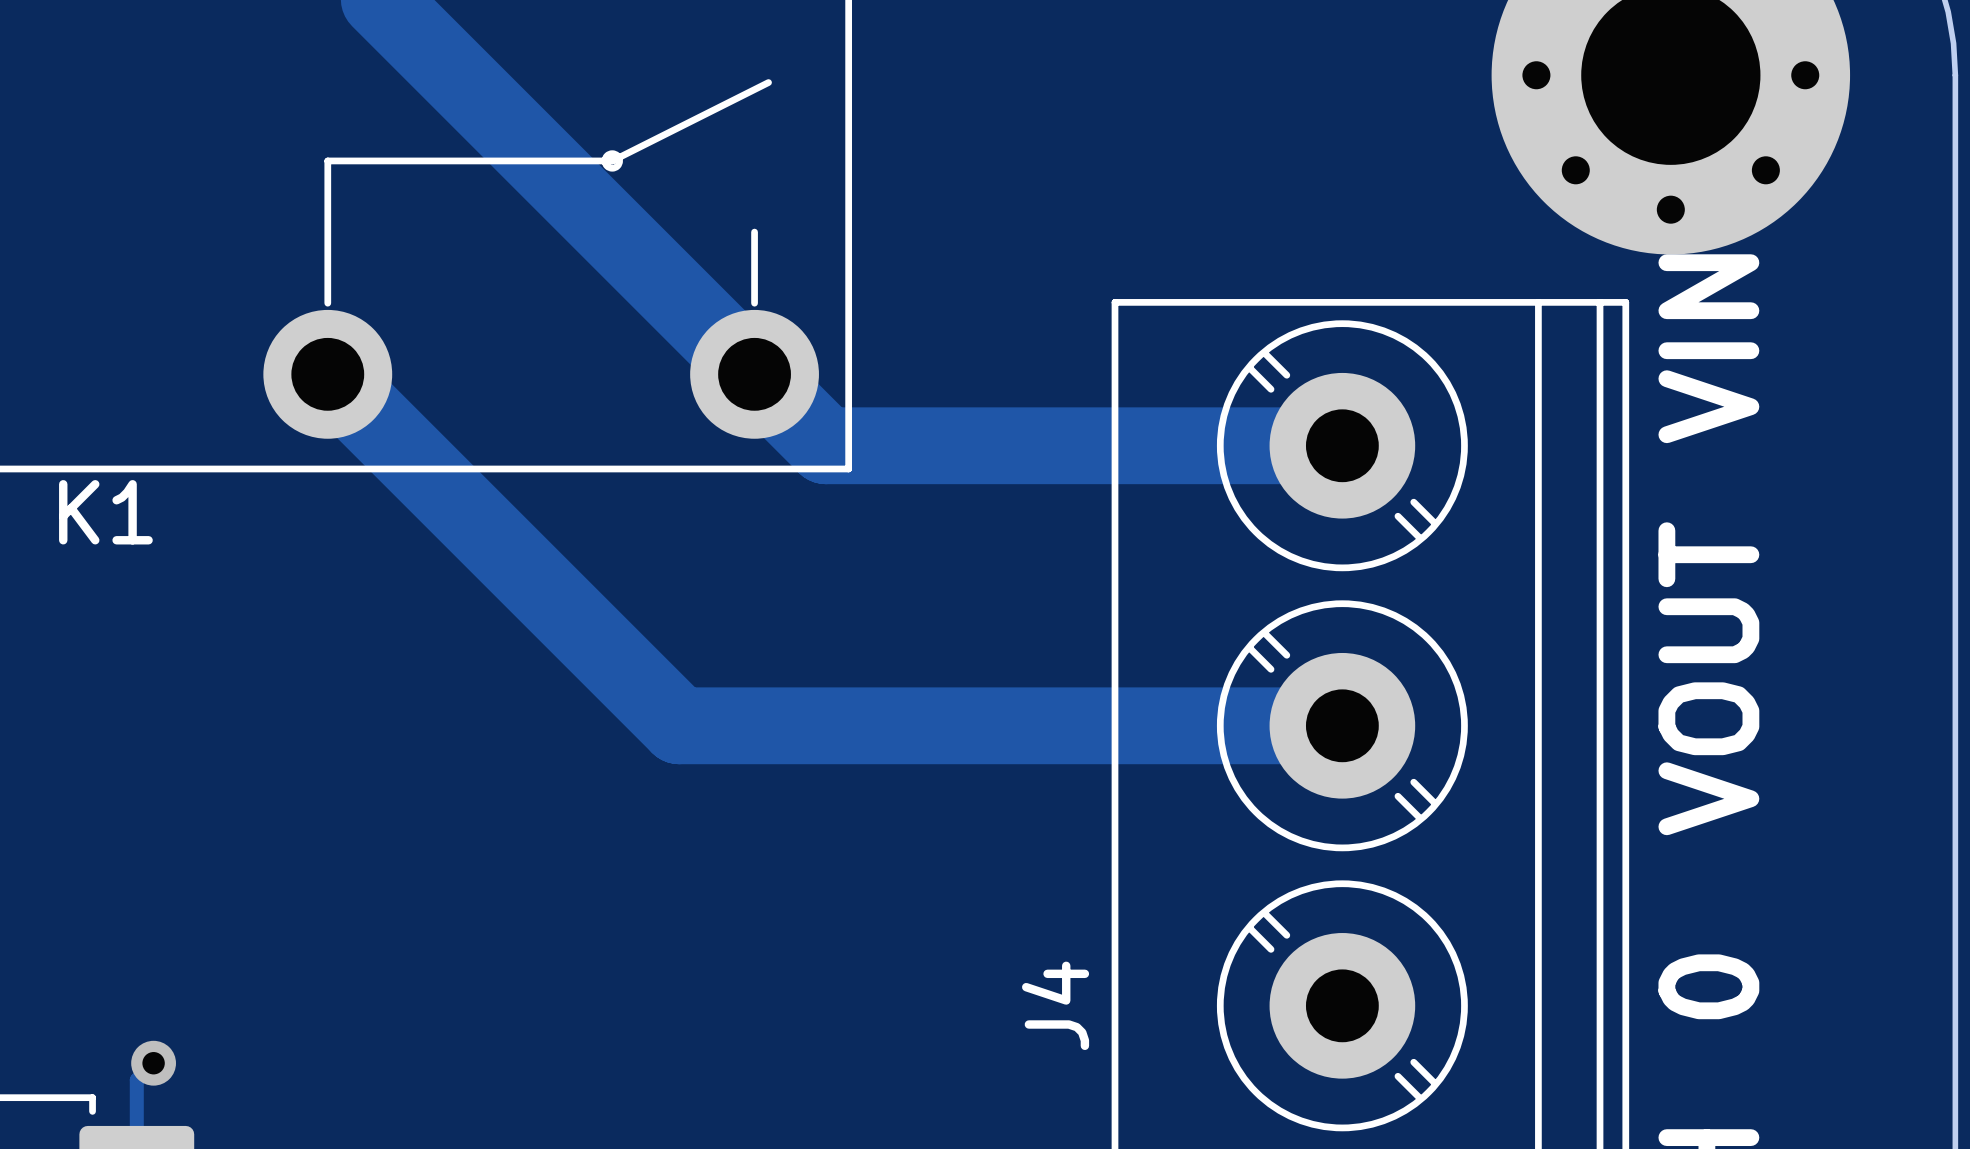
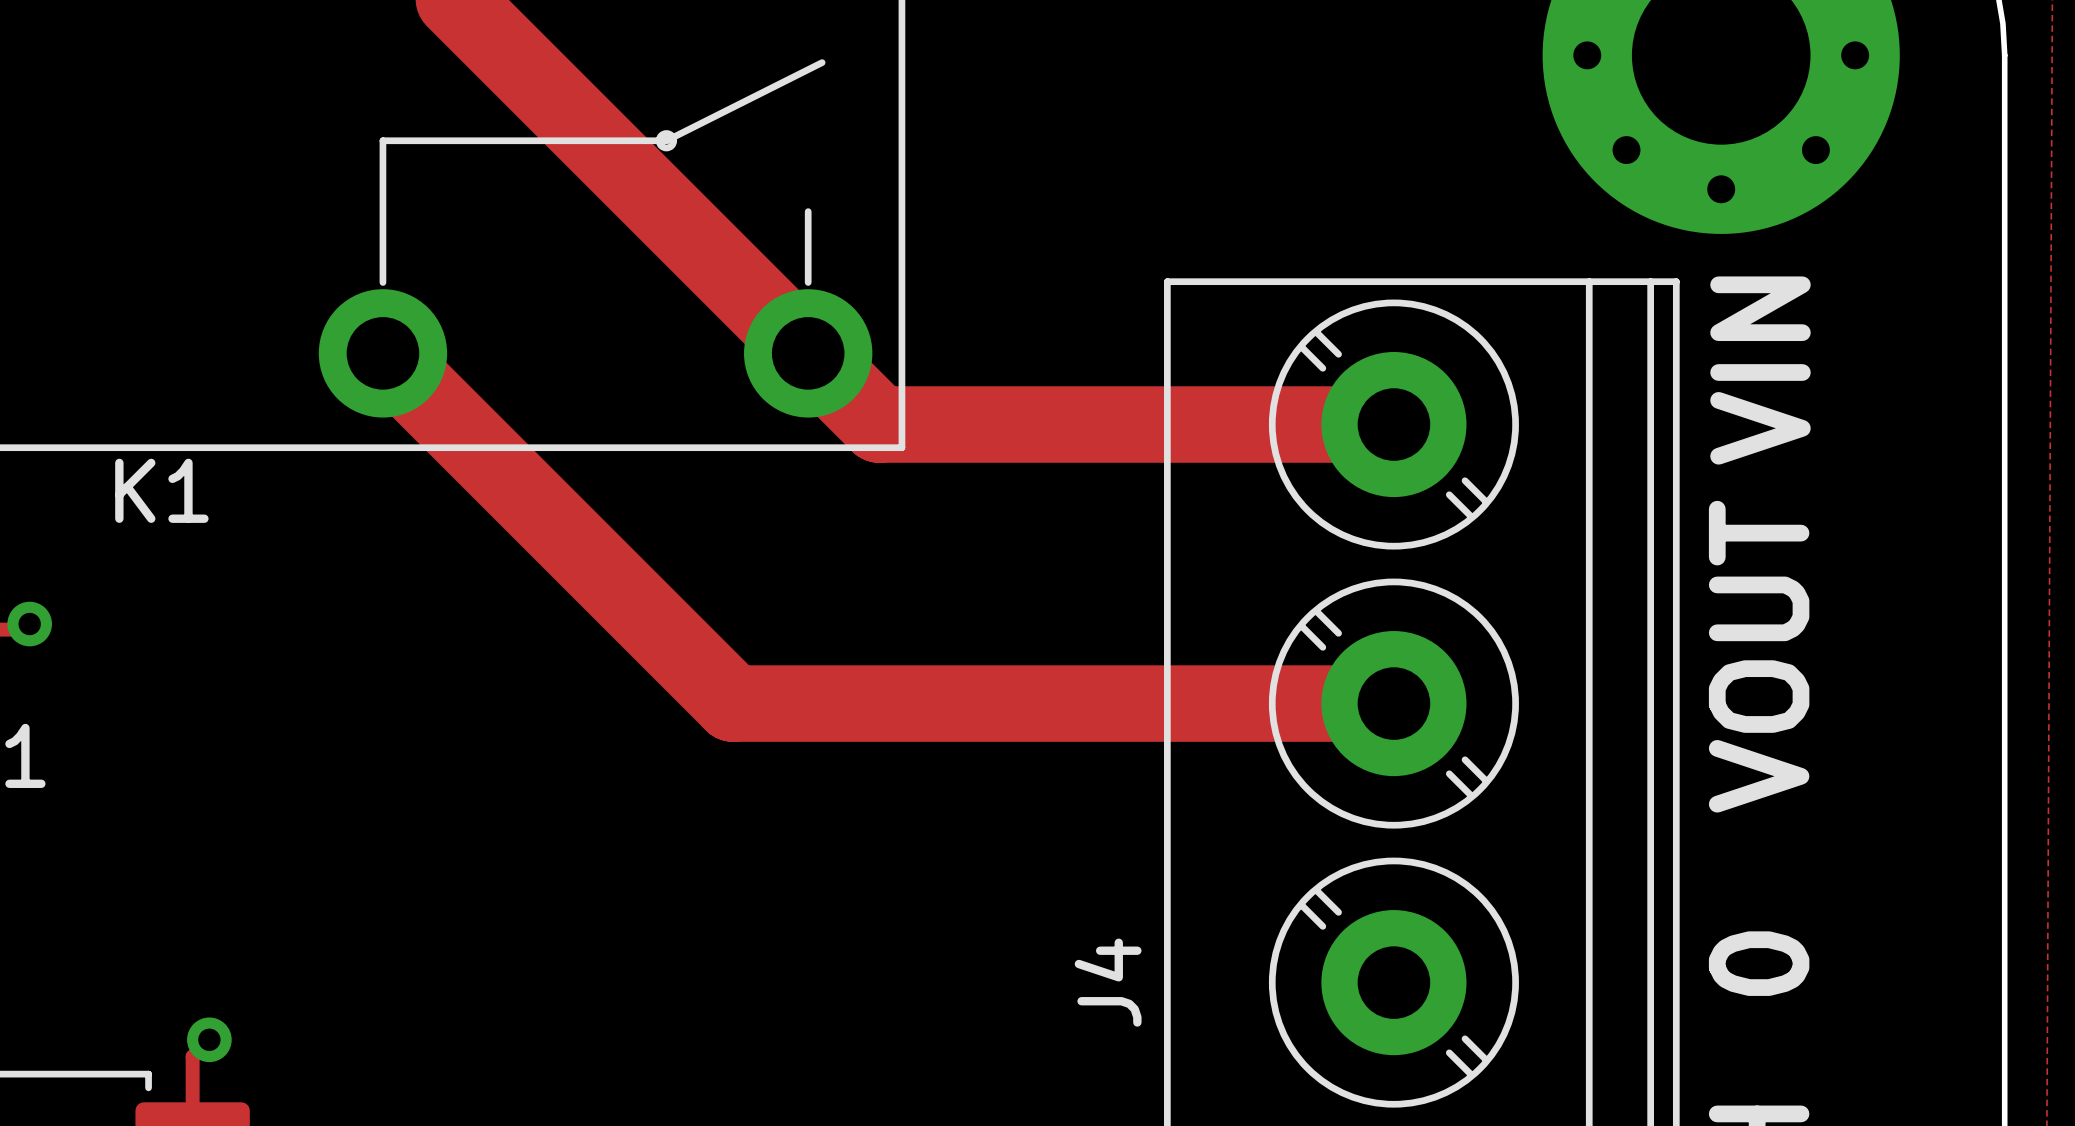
text position: VIN (1708, 348) -> VIN (1760, 370)

